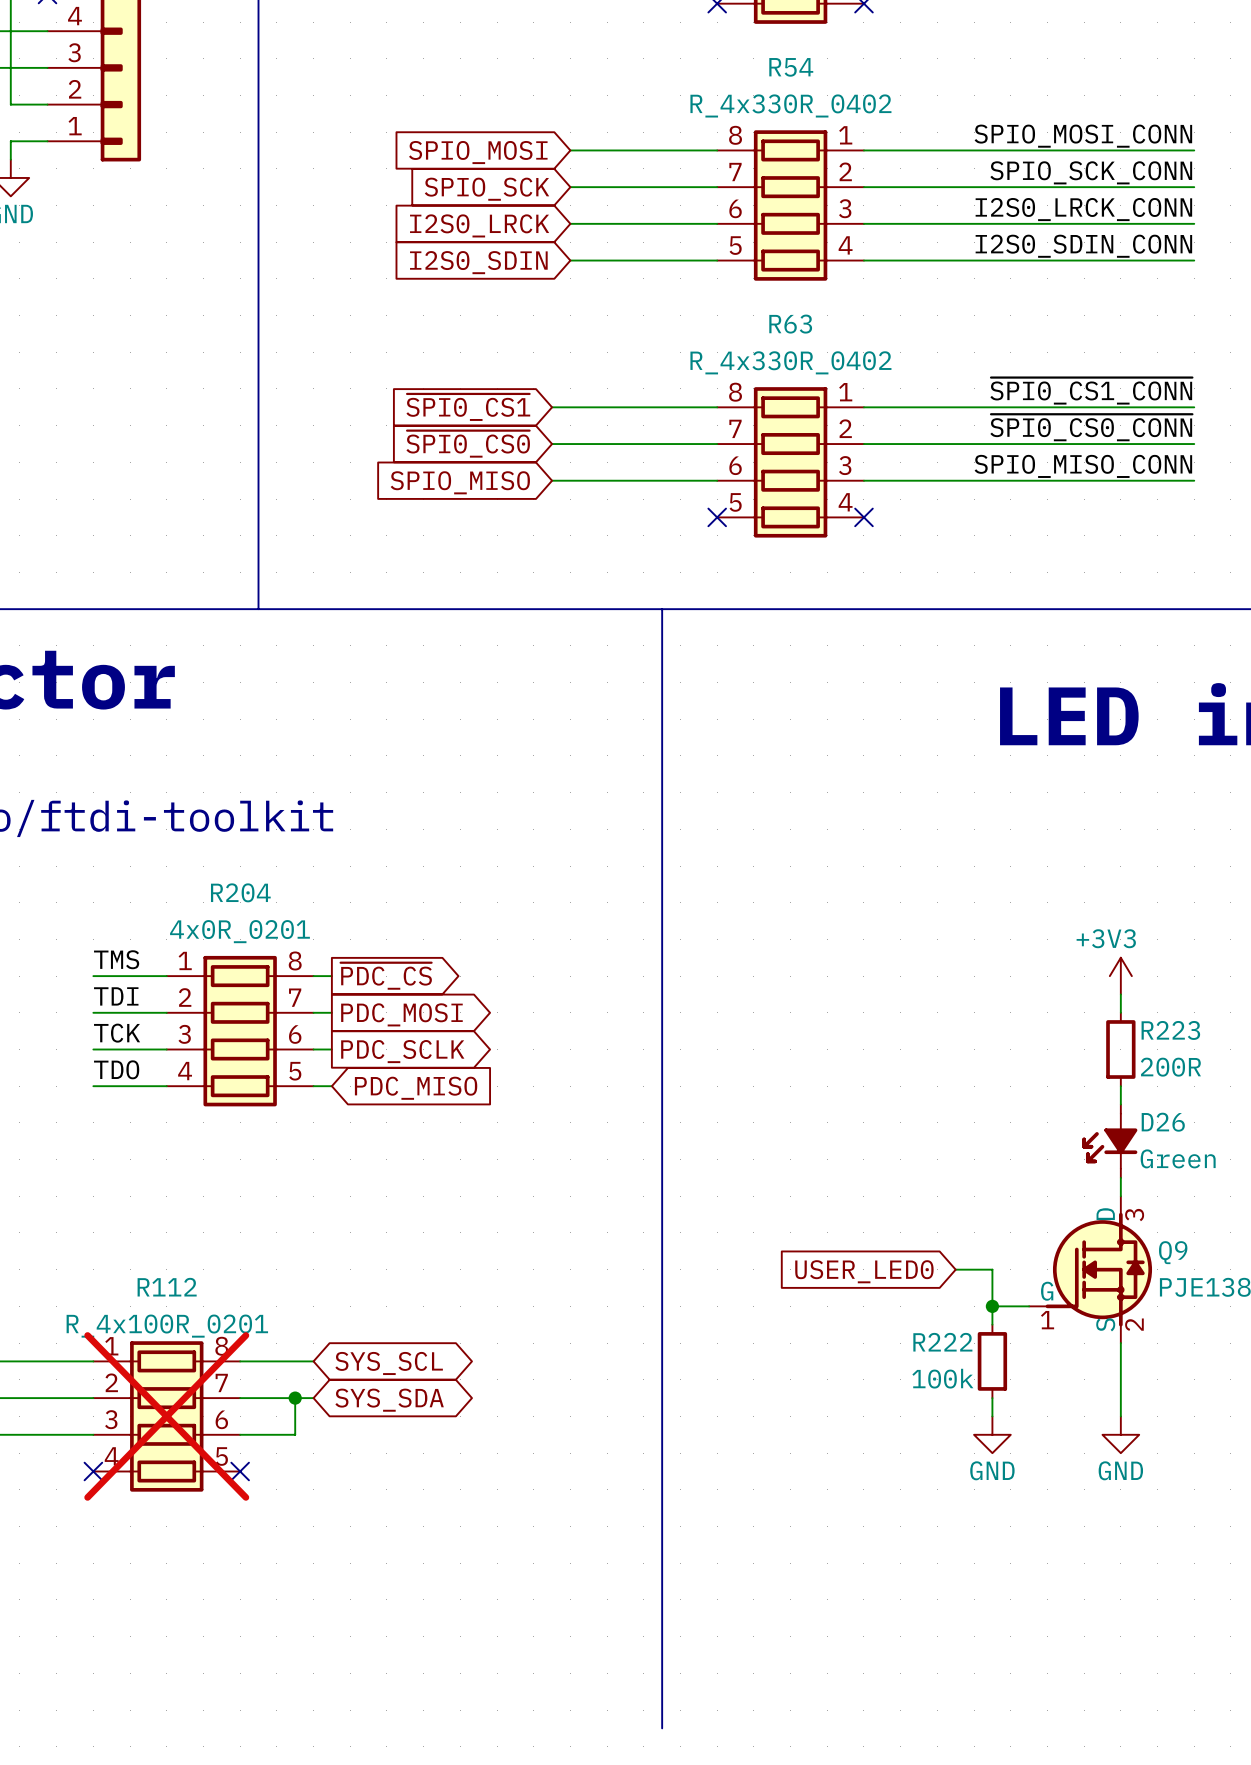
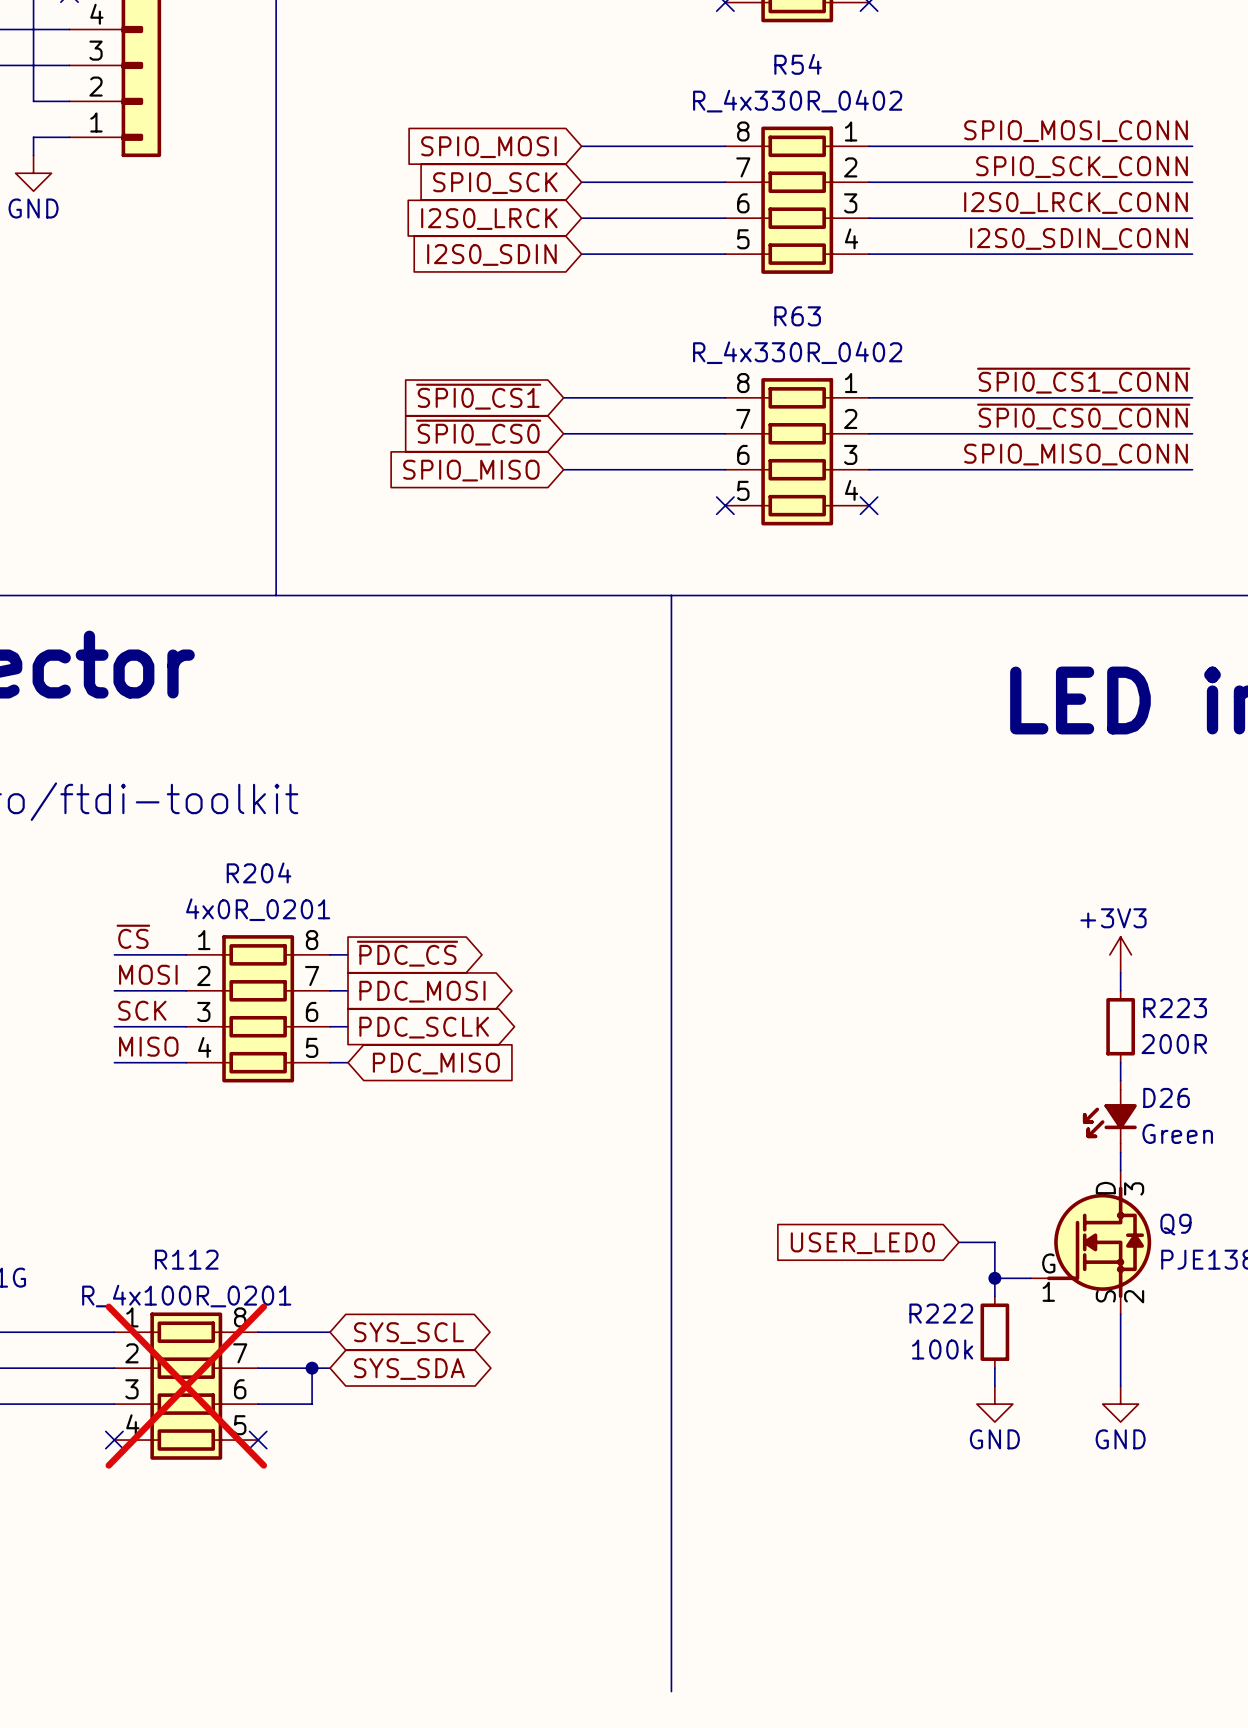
label: TMS (116, 959) -> ~{CS} (133, 936)
label: TDI (116, 996) -> MOSI (148, 974)
label: TCK (117, 1033) -> SCK (142, 1010)
label: TDO (116, 1069) -> MISO (148, 1046)

